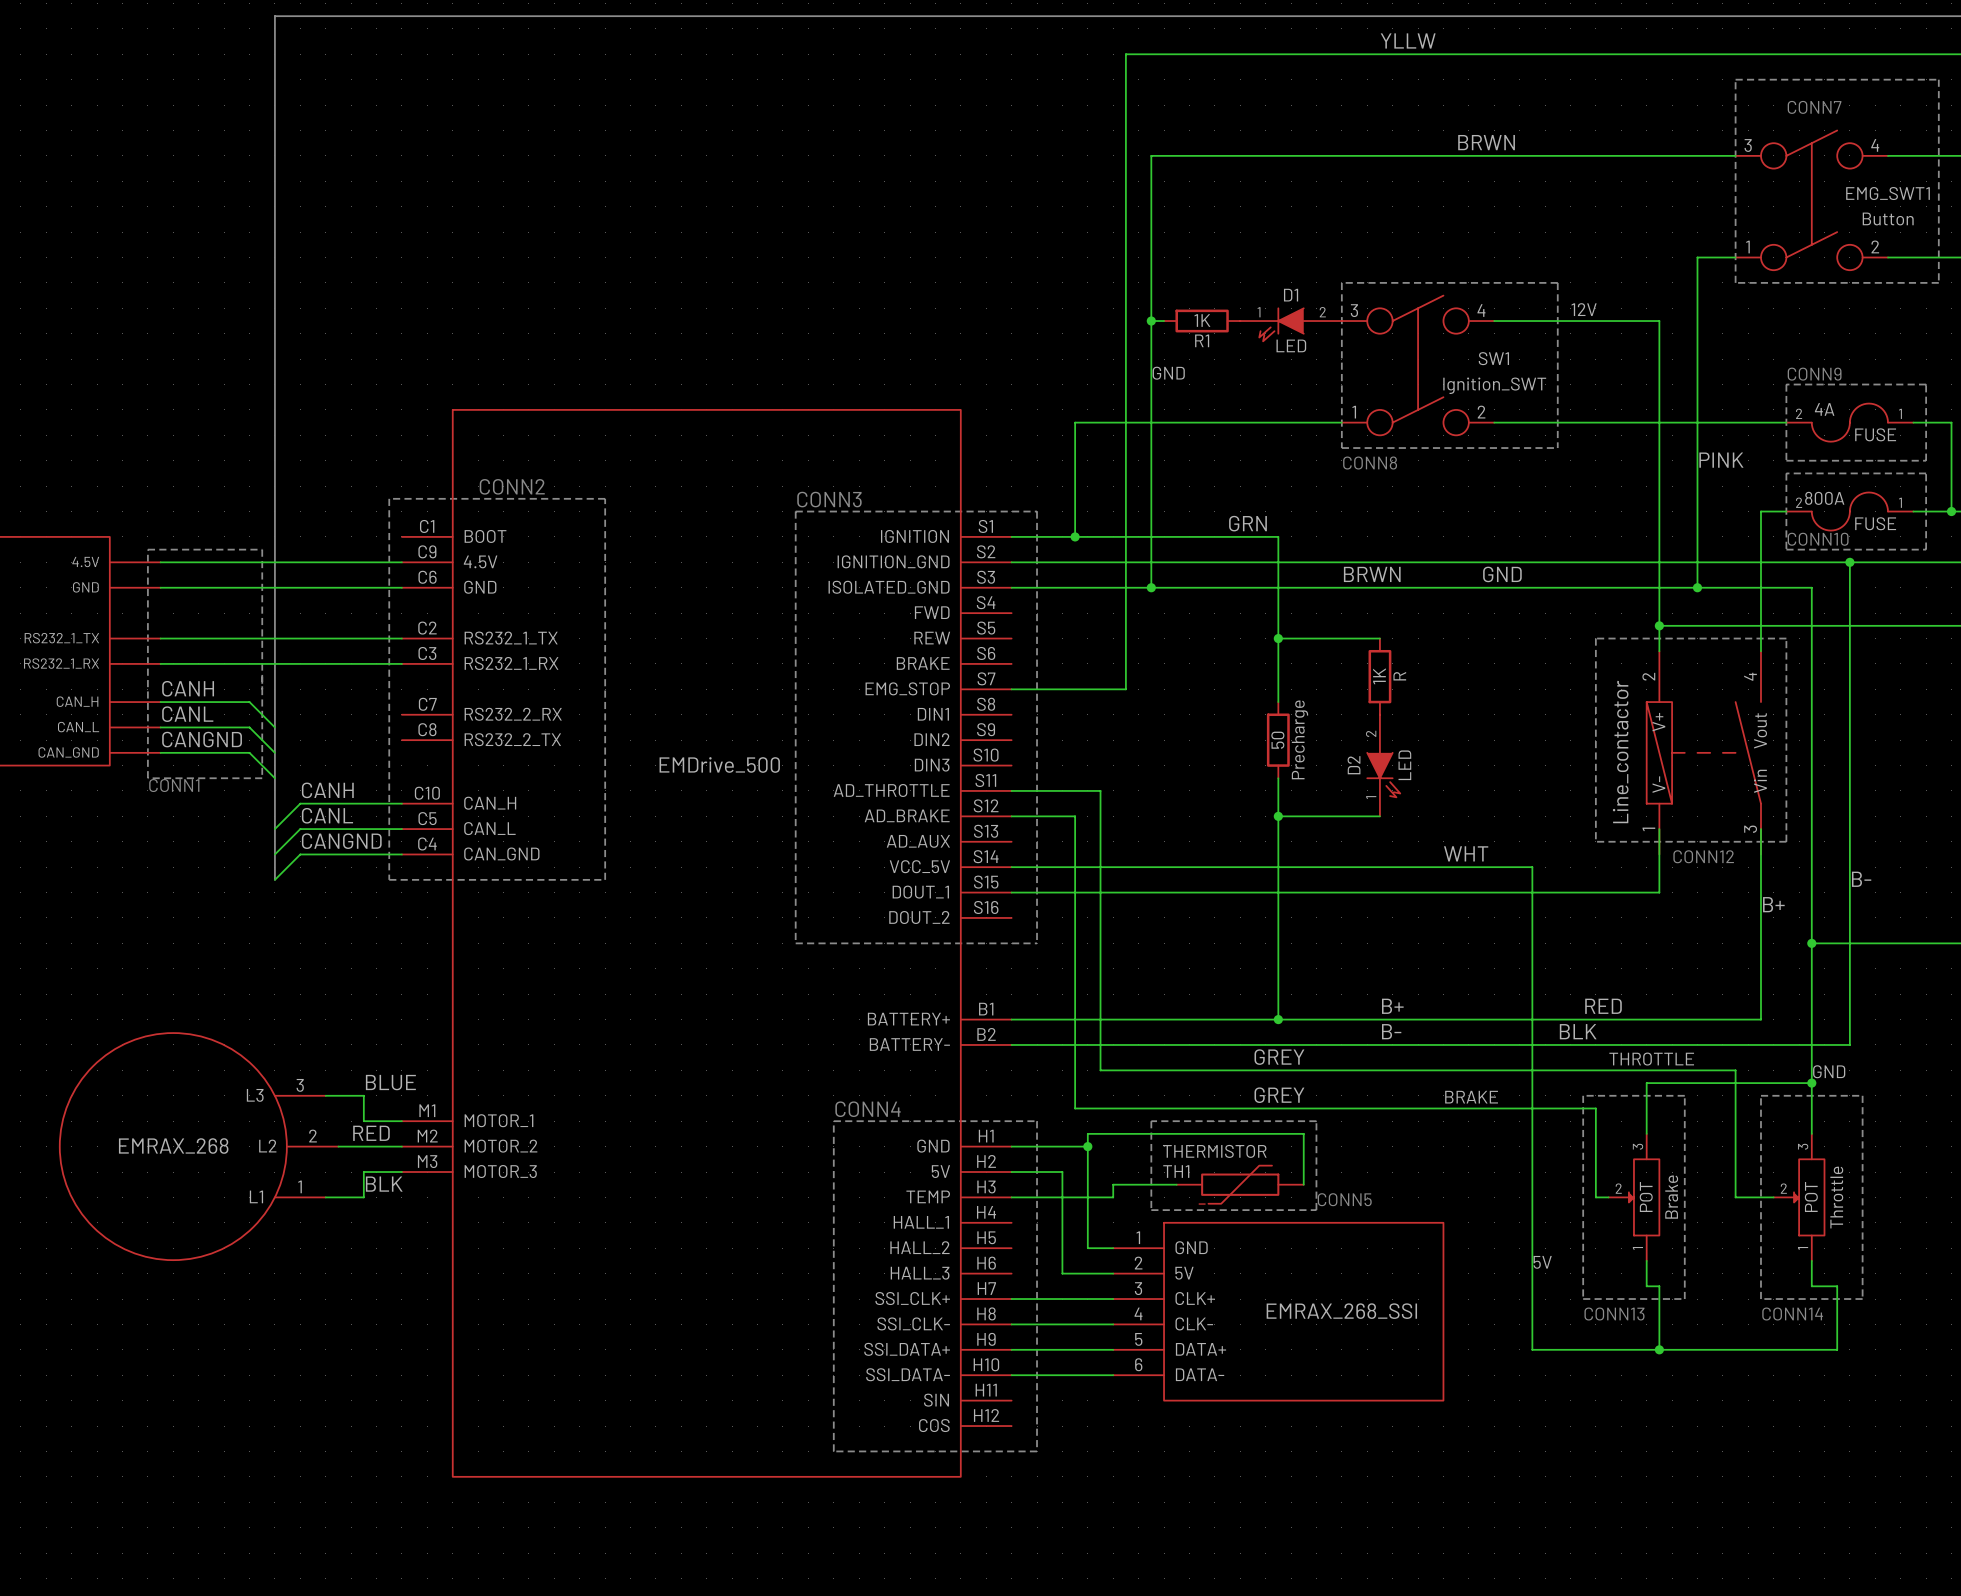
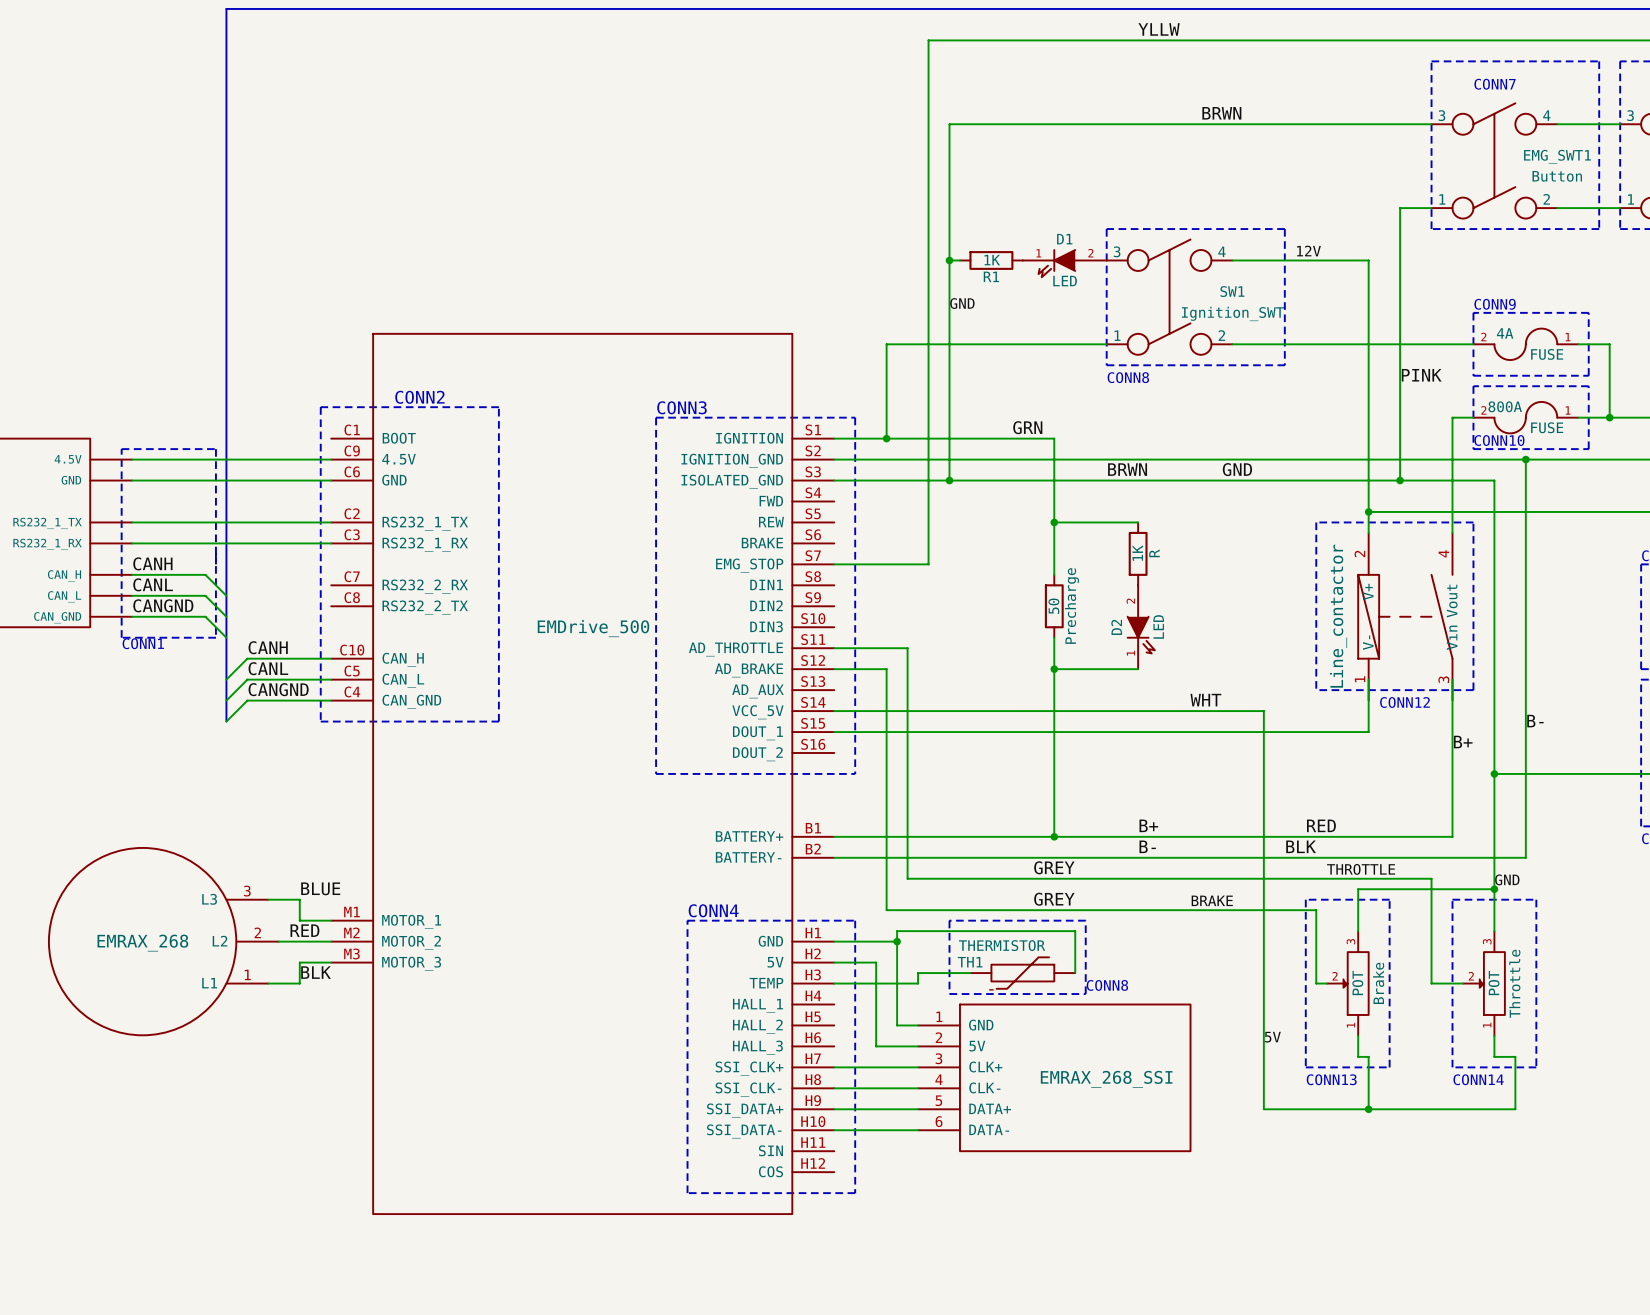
text: CONN5 (1344, 1199) -> CONN8 (1107, 985)

